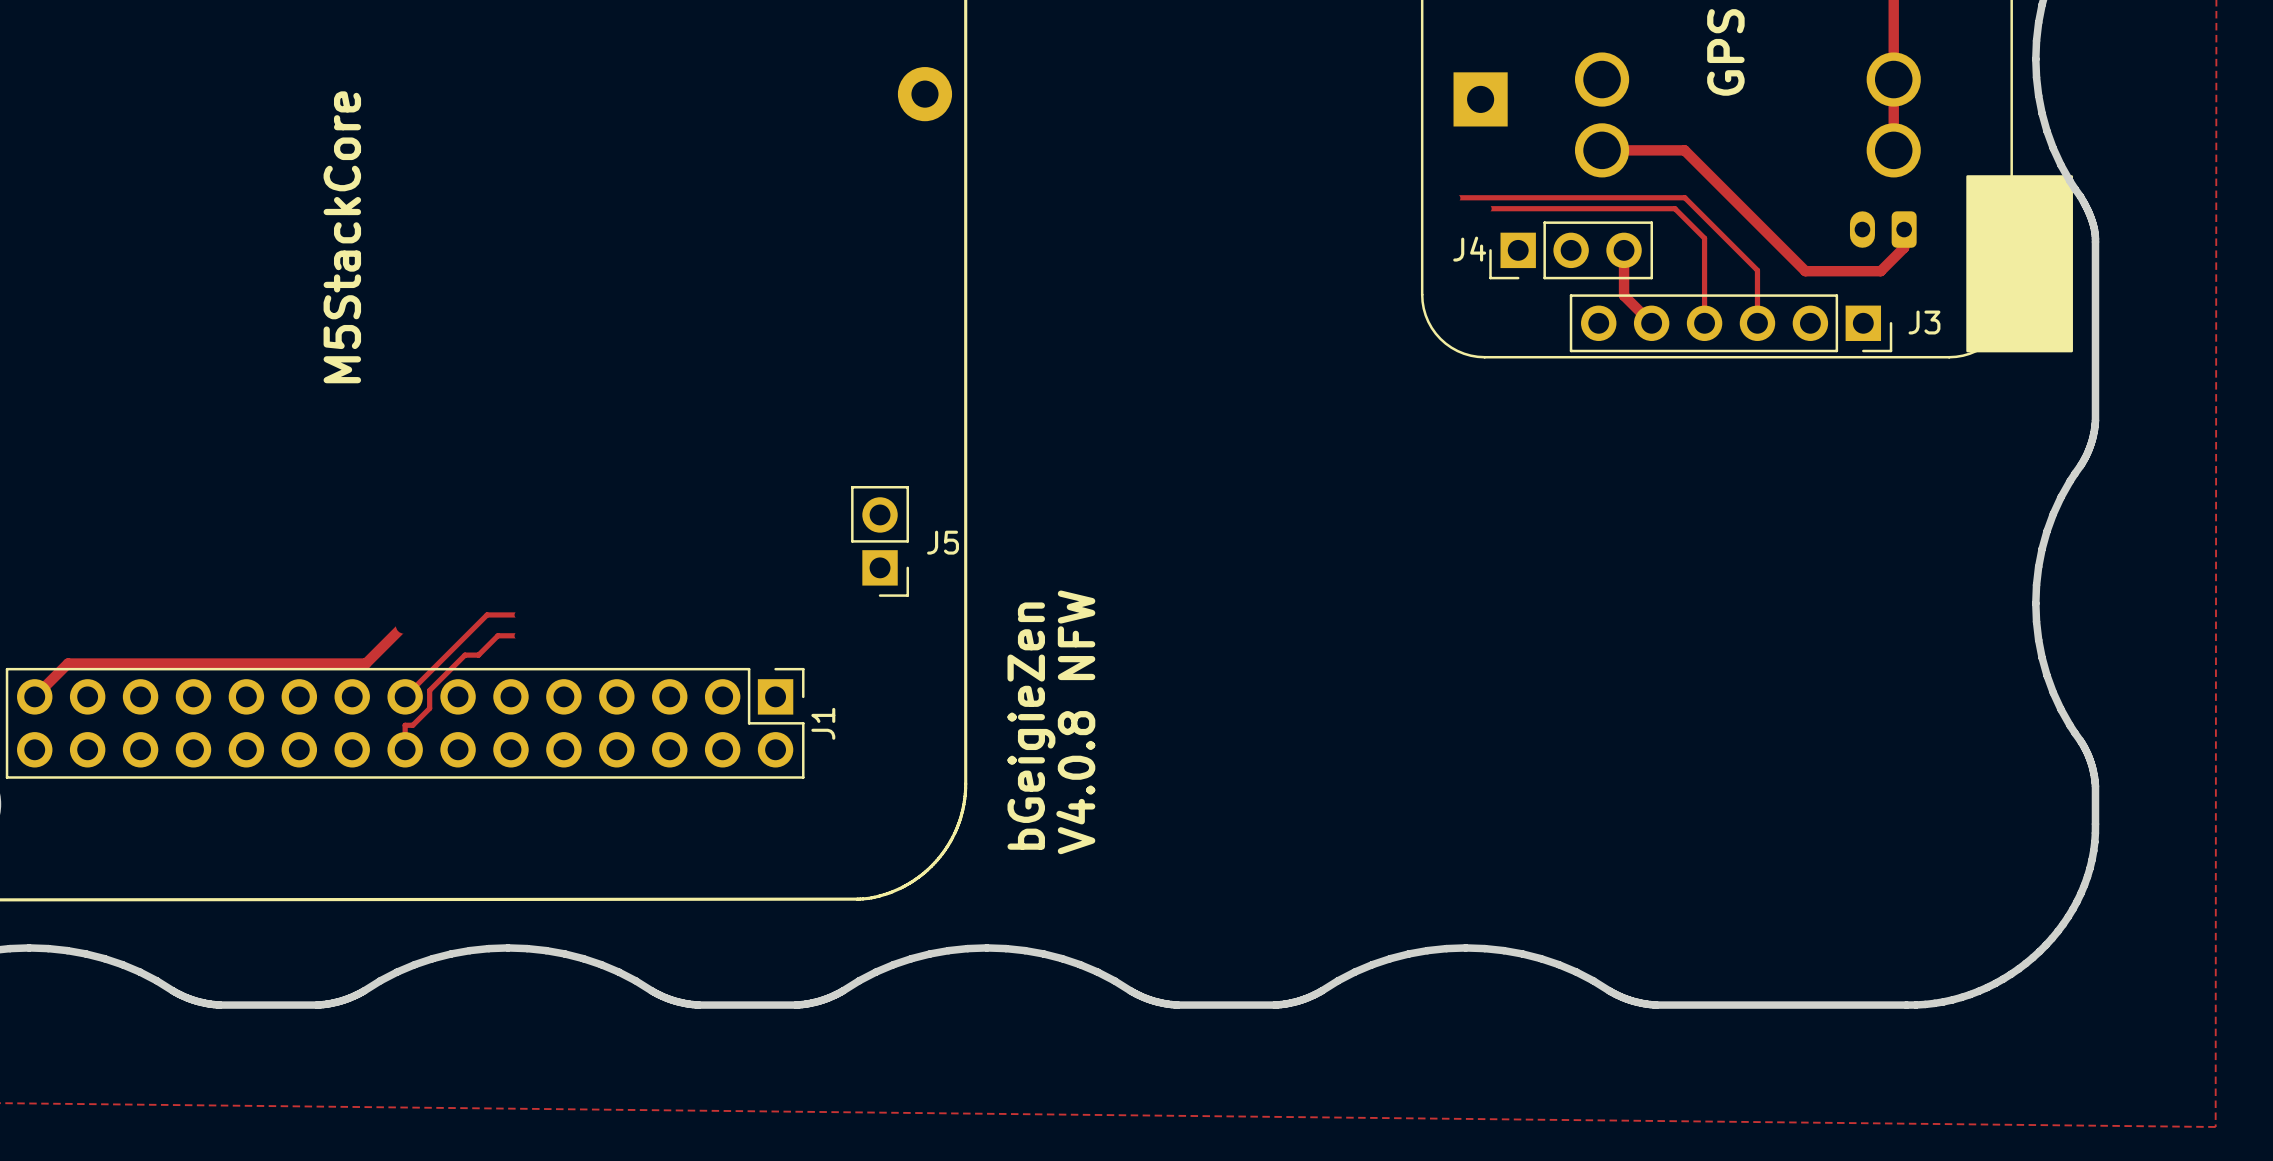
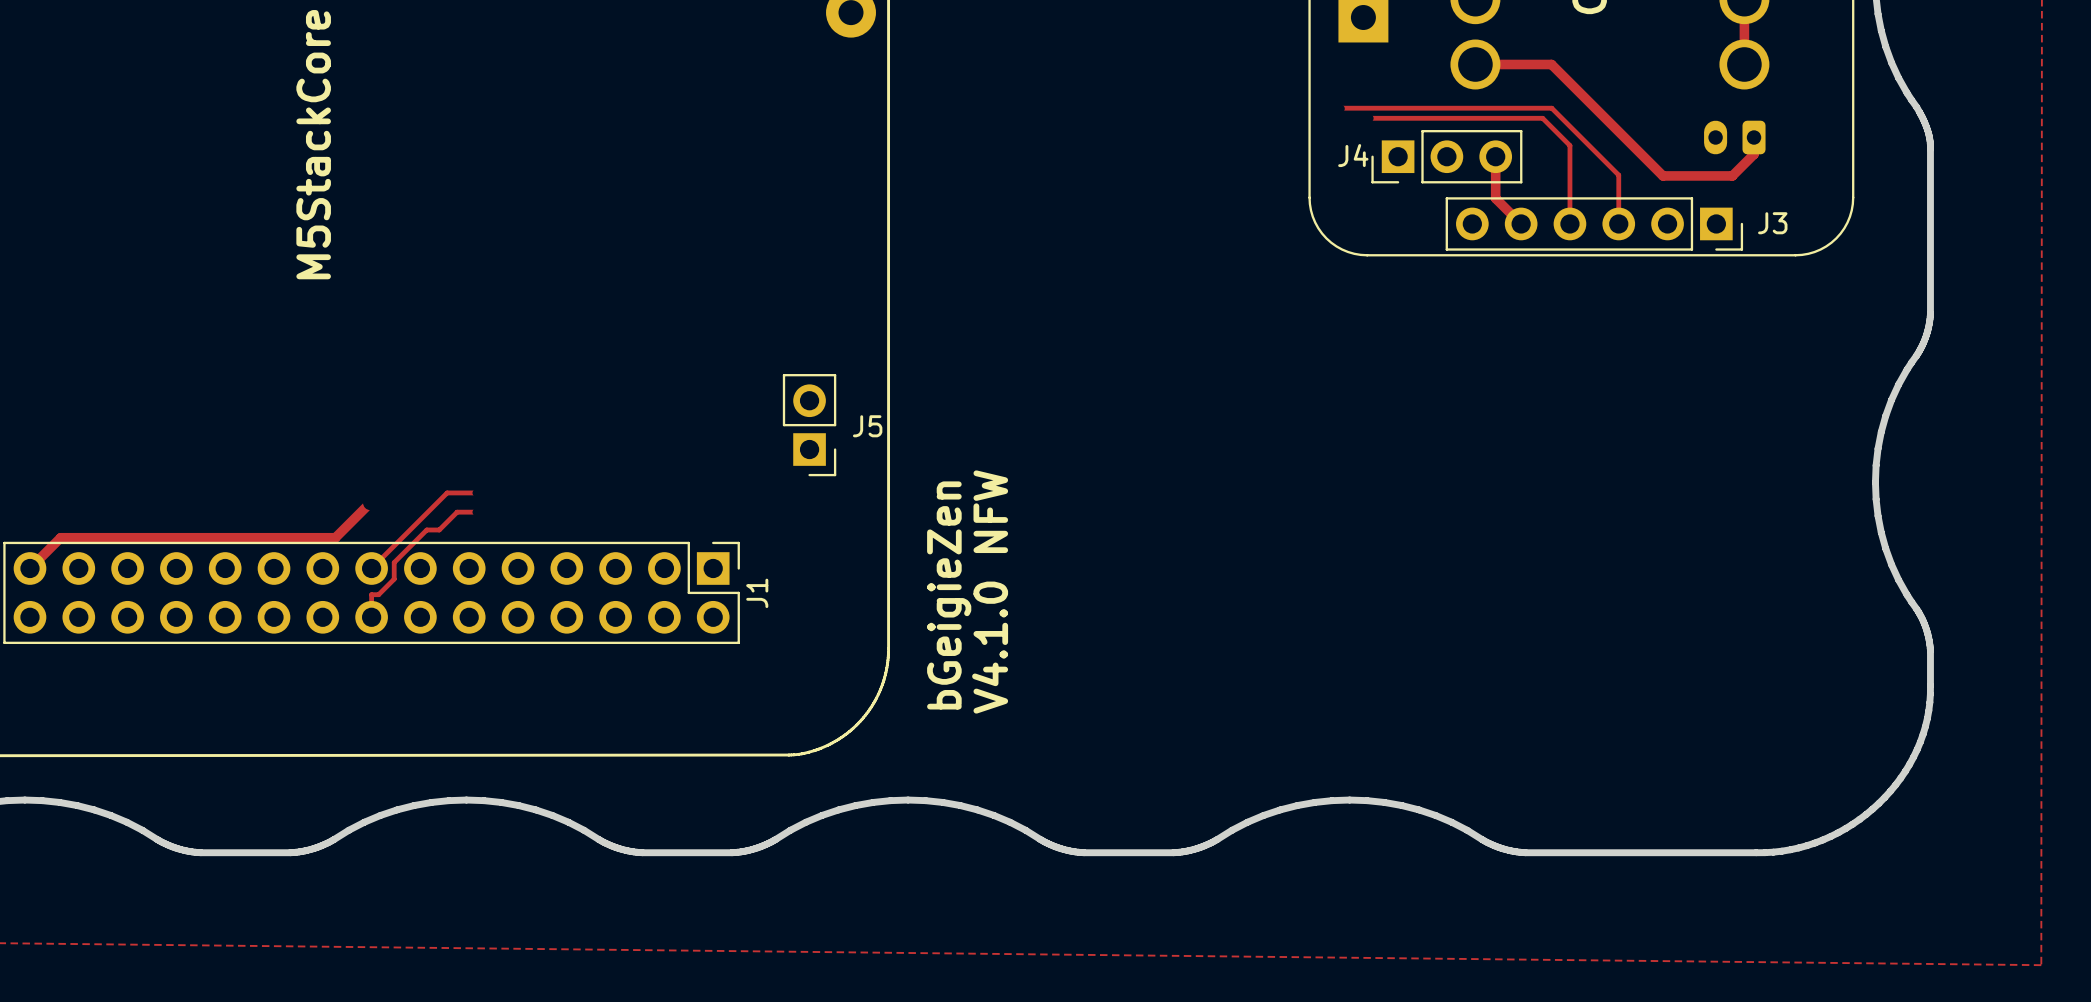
drawing: [1966, 175, 2073, 353] -> none
text: V4.0.8 NFW (1075, 722) -> V4.1.0 NFW (990, 592)

